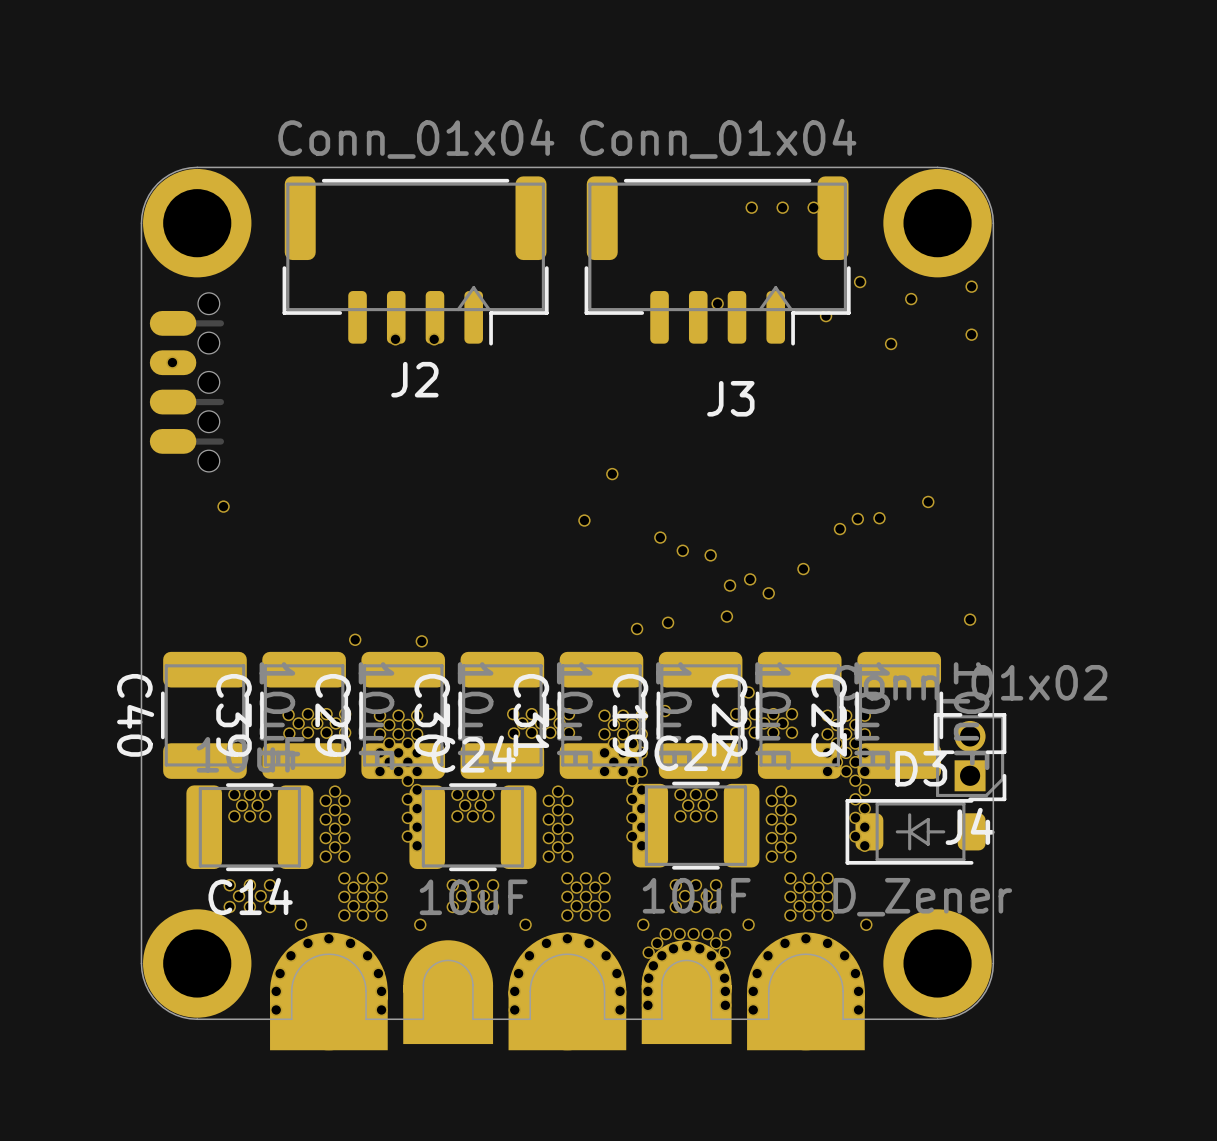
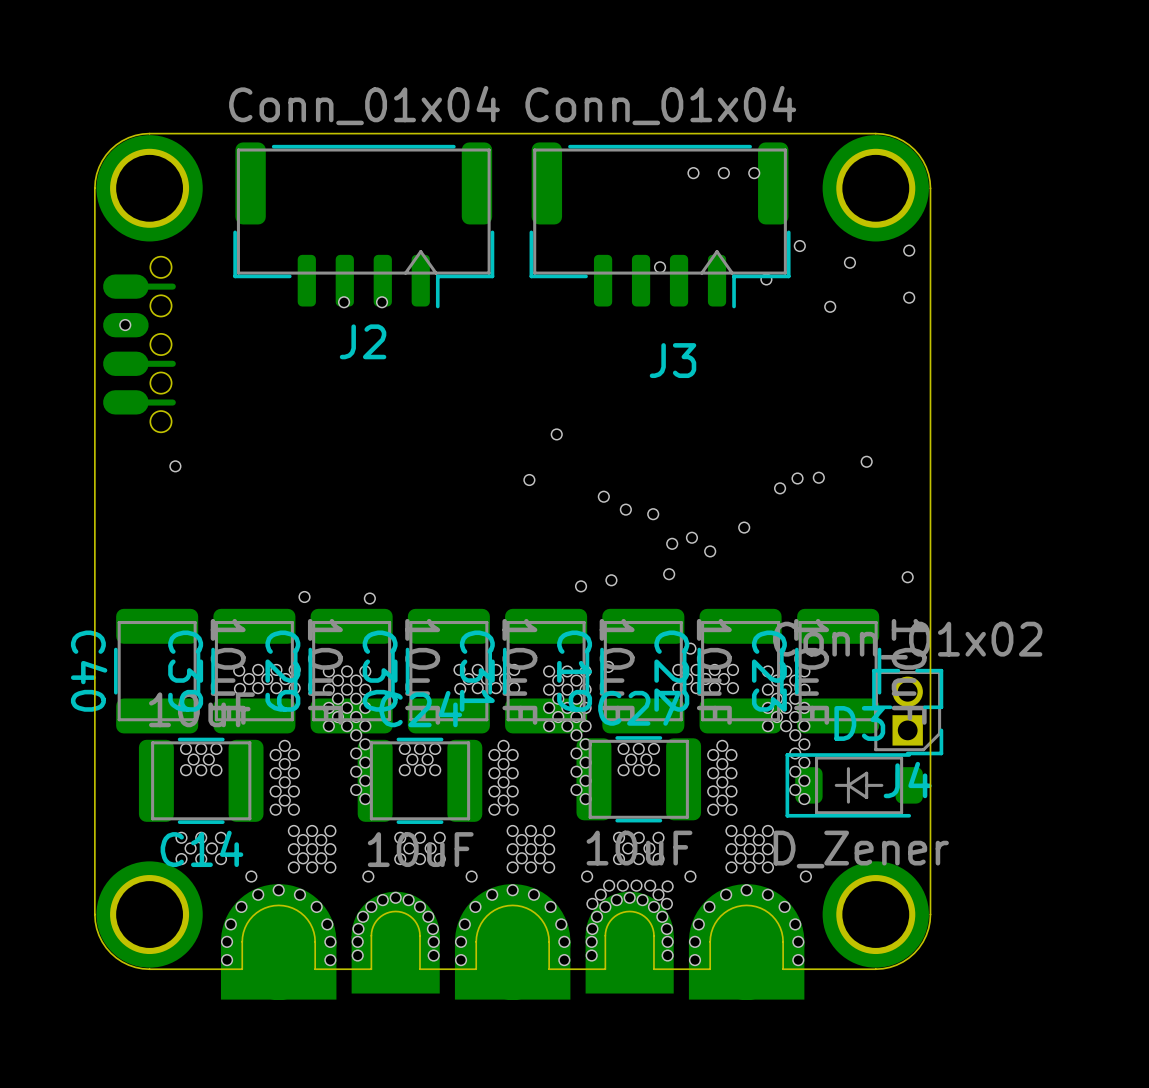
via: none -> (395, 897)
via: none -> (382, 900)
via: none -> (408, 900)
via: none -> (371, 906)
via: none -> (420, 906)
via: none -> (363, 916)
via: none -> (428, 916)
via: none -> (358, 928)
via: none -> (432, 928)
via: none -> (357, 941)
via: none -> (433, 941)
via: none -> (357, 955)
via: none -> (433, 955)

